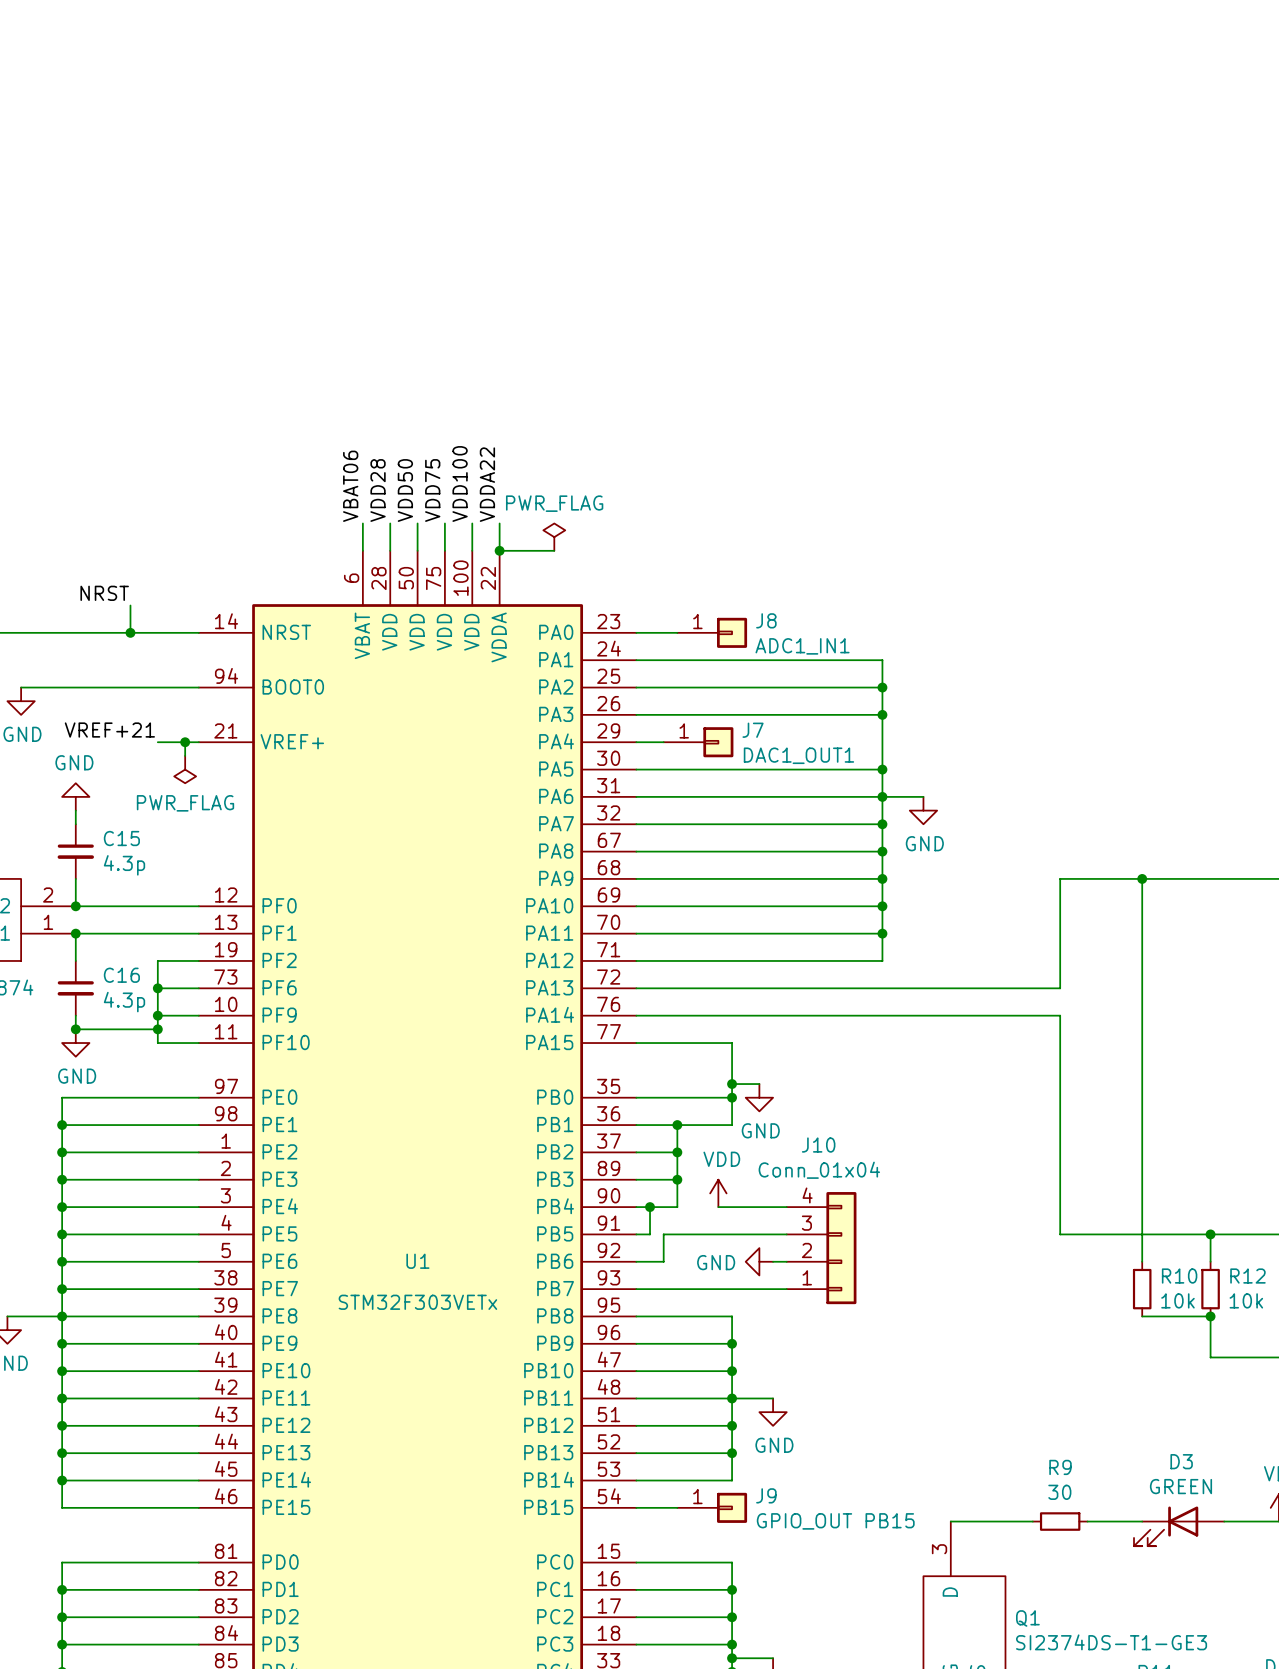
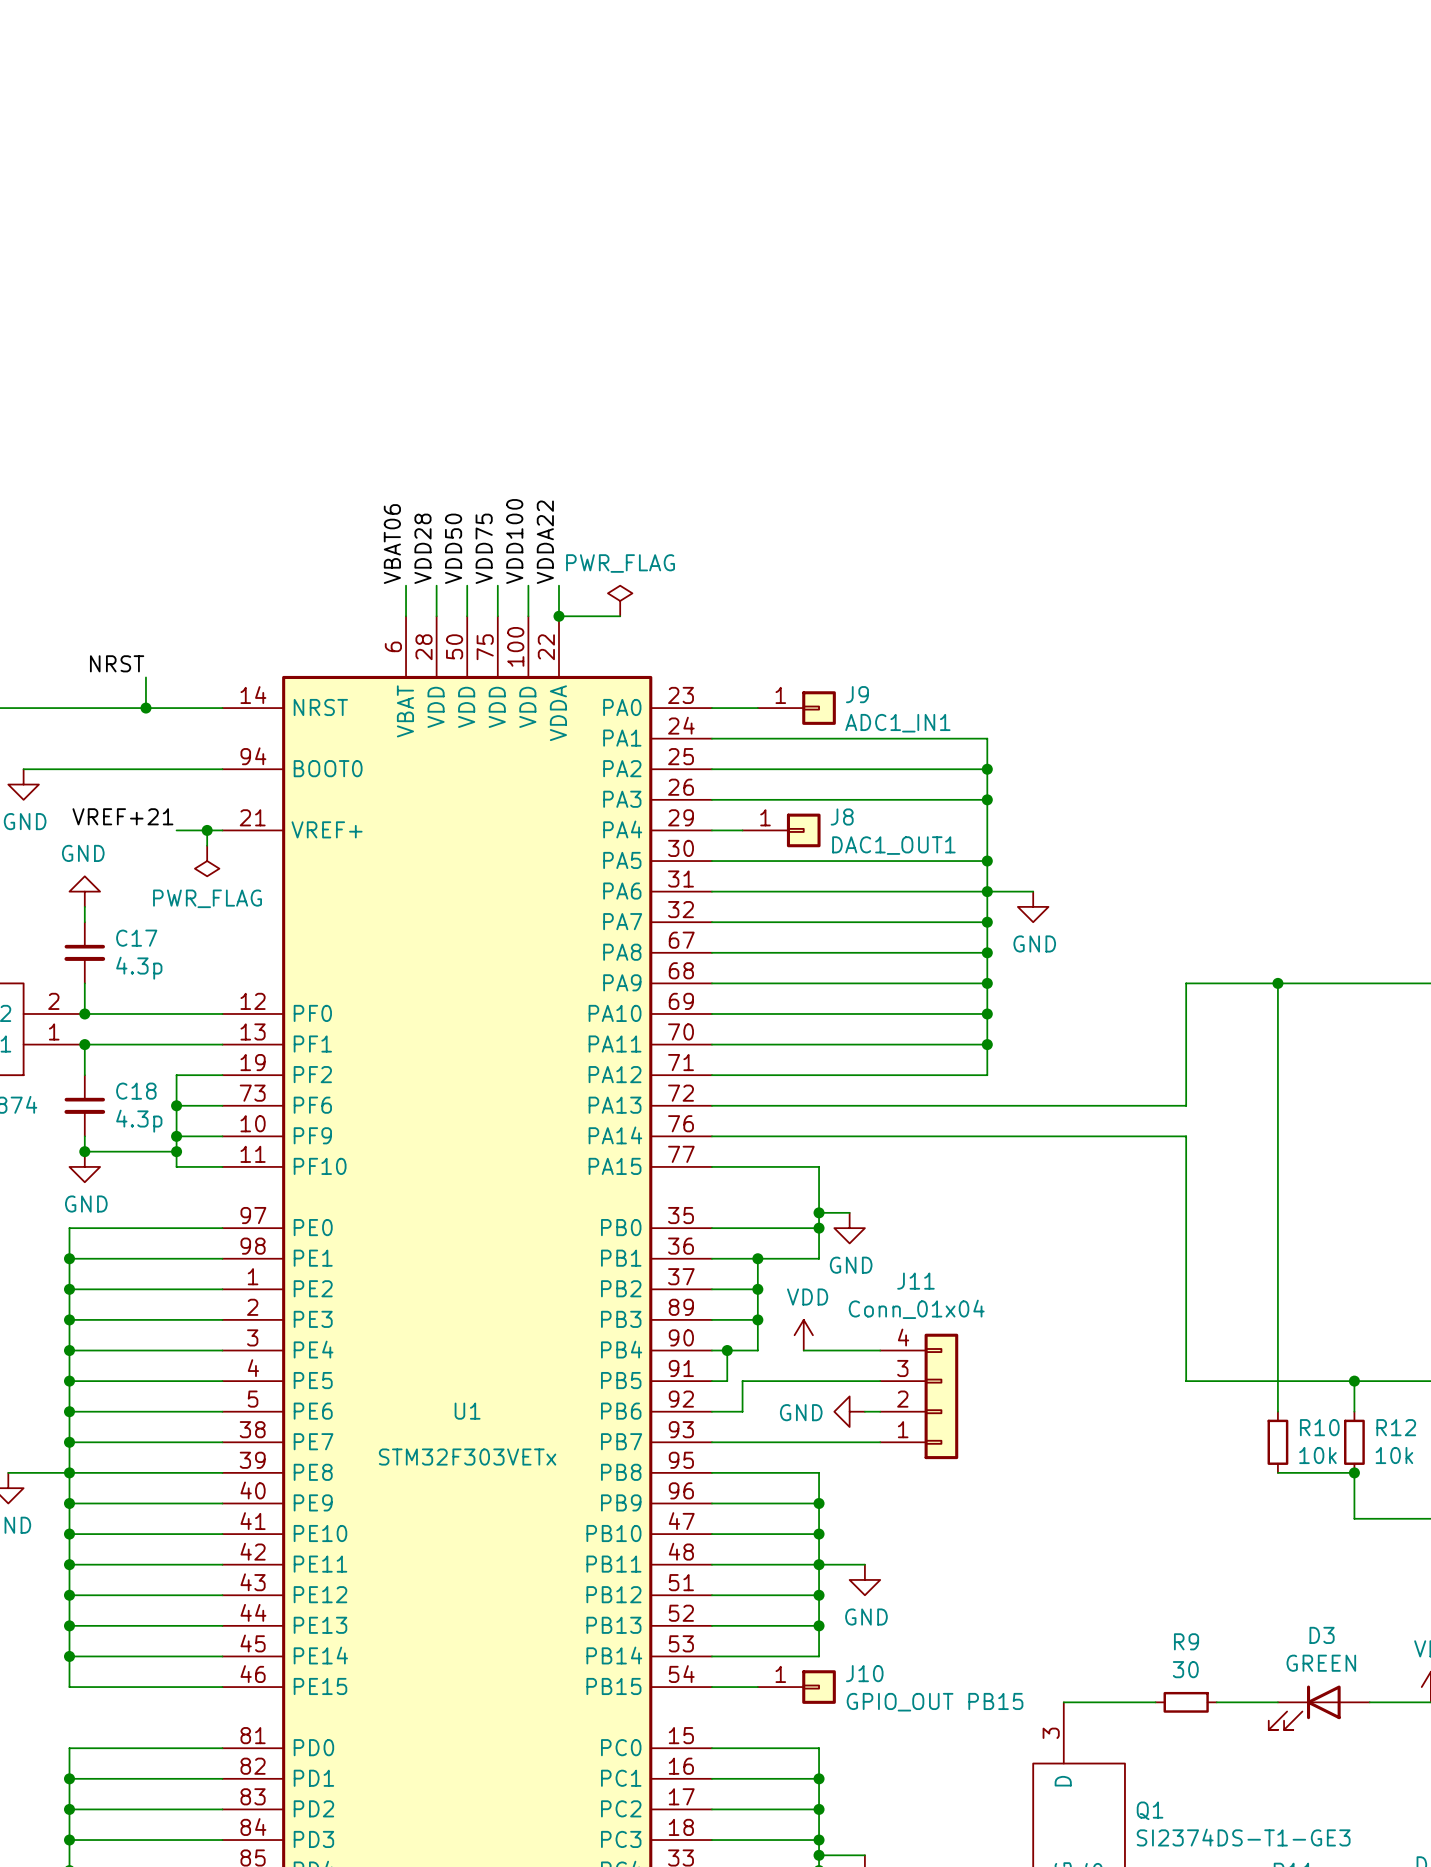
J8 name: J8 (766, 620) -> J9 (857, 694)
J7 name: J7 (753, 730) -> J8 (842, 817)
C15 name: C15 (121, 838) -> C17 (136, 938)
C16 name: C16 (121, 975) -> C18 (136, 1091)
J10 name: J10 (818, 1145) -> J11 (915, 1281)
J9 name: J9 (766, 1495) -> J10 (864, 1673)

